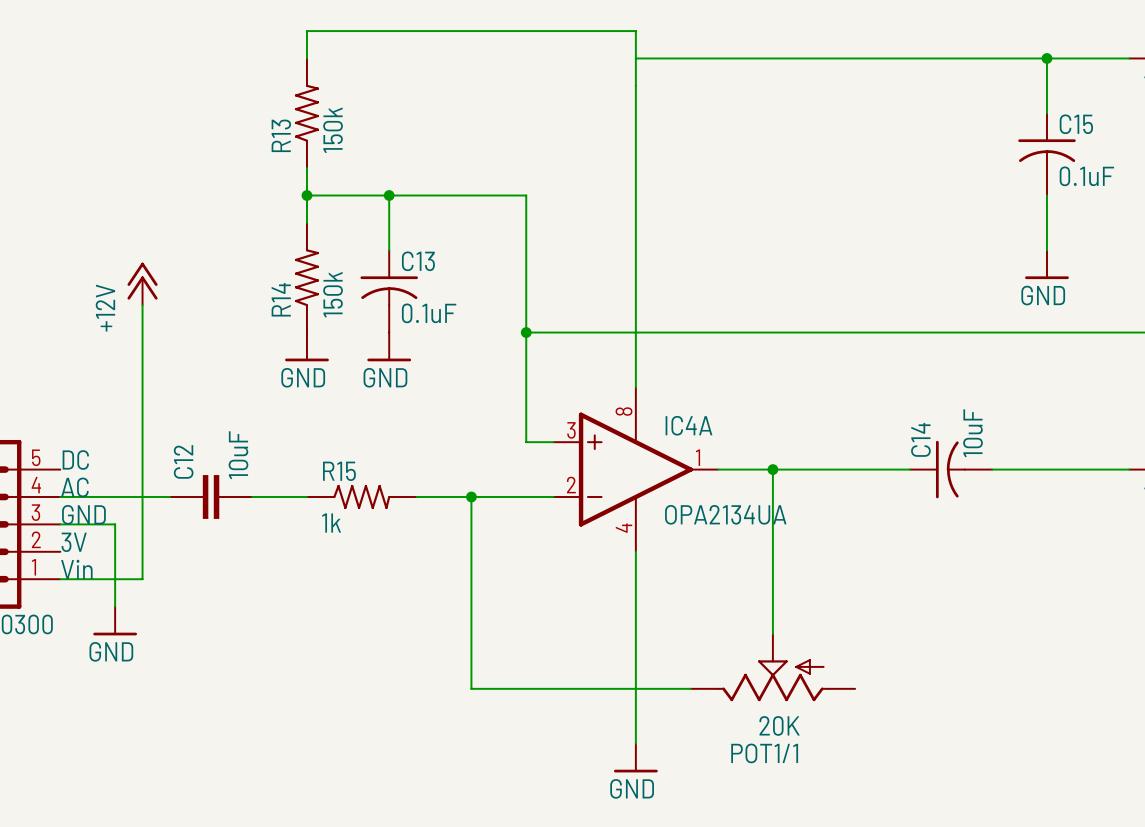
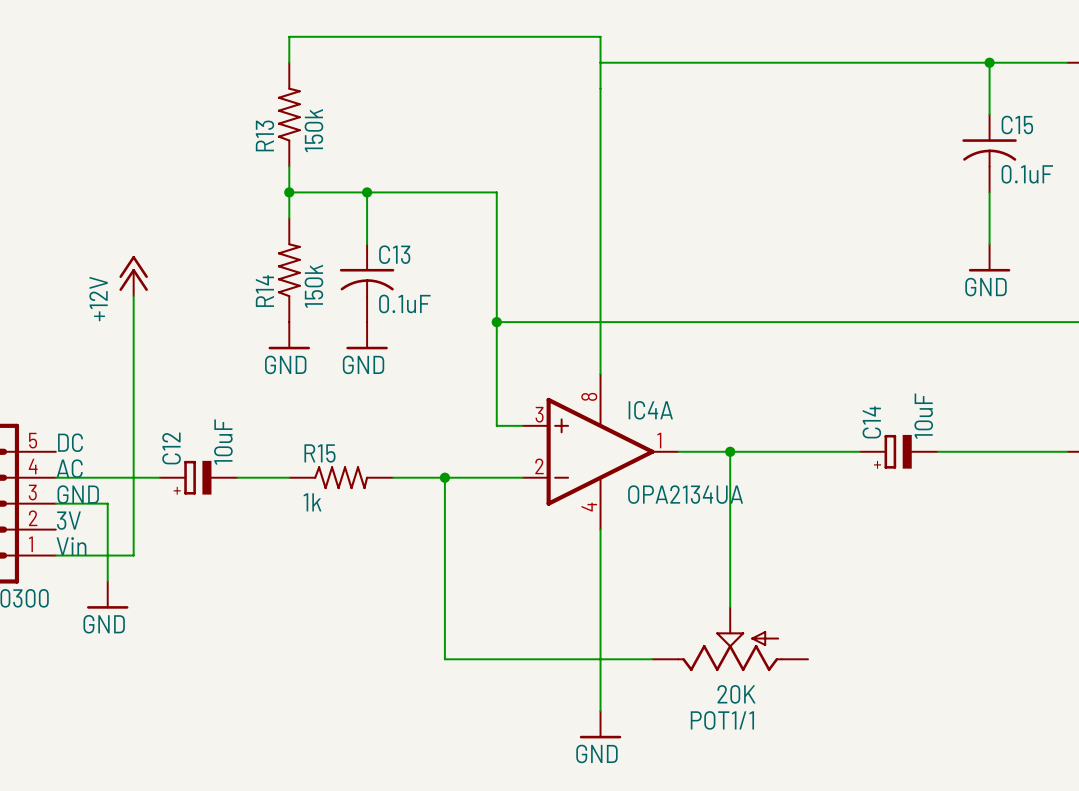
C14 symbol: [909, 440, 993, 499] -> [859, 434, 938, 469]
C12 symbol: [169, 475, 253, 519] -> [159, 460, 238, 495]

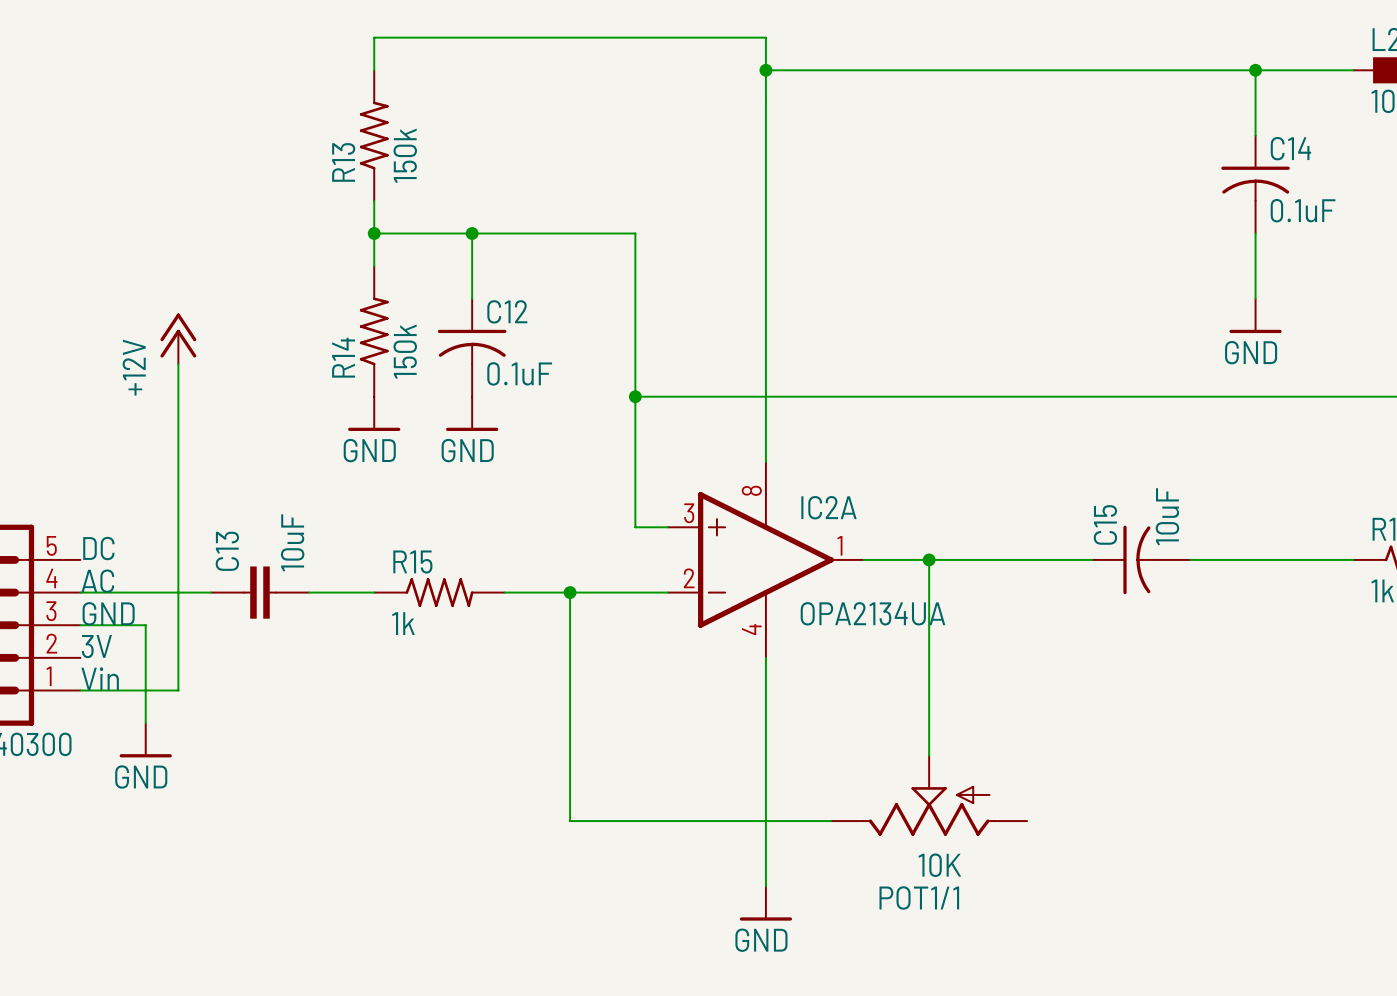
junction: none -> (765, 70)
C15 name: C15 (1017, 125) -> C14 (1290, 148)
C13 name: C13 (394, 254) -> C12 (507, 311)
IC4A name: IC4A (650, 410) -> IC2A (828, 507)
C14: 10uF (898, 451) -> none
C15: none -> 10uF (1141, 559)
C12: 10uF (198, 477) -> none
C13: none -> 10uF (259, 592)
POT1/1 value: 20K (736, 694) -> 10K (939, 865)

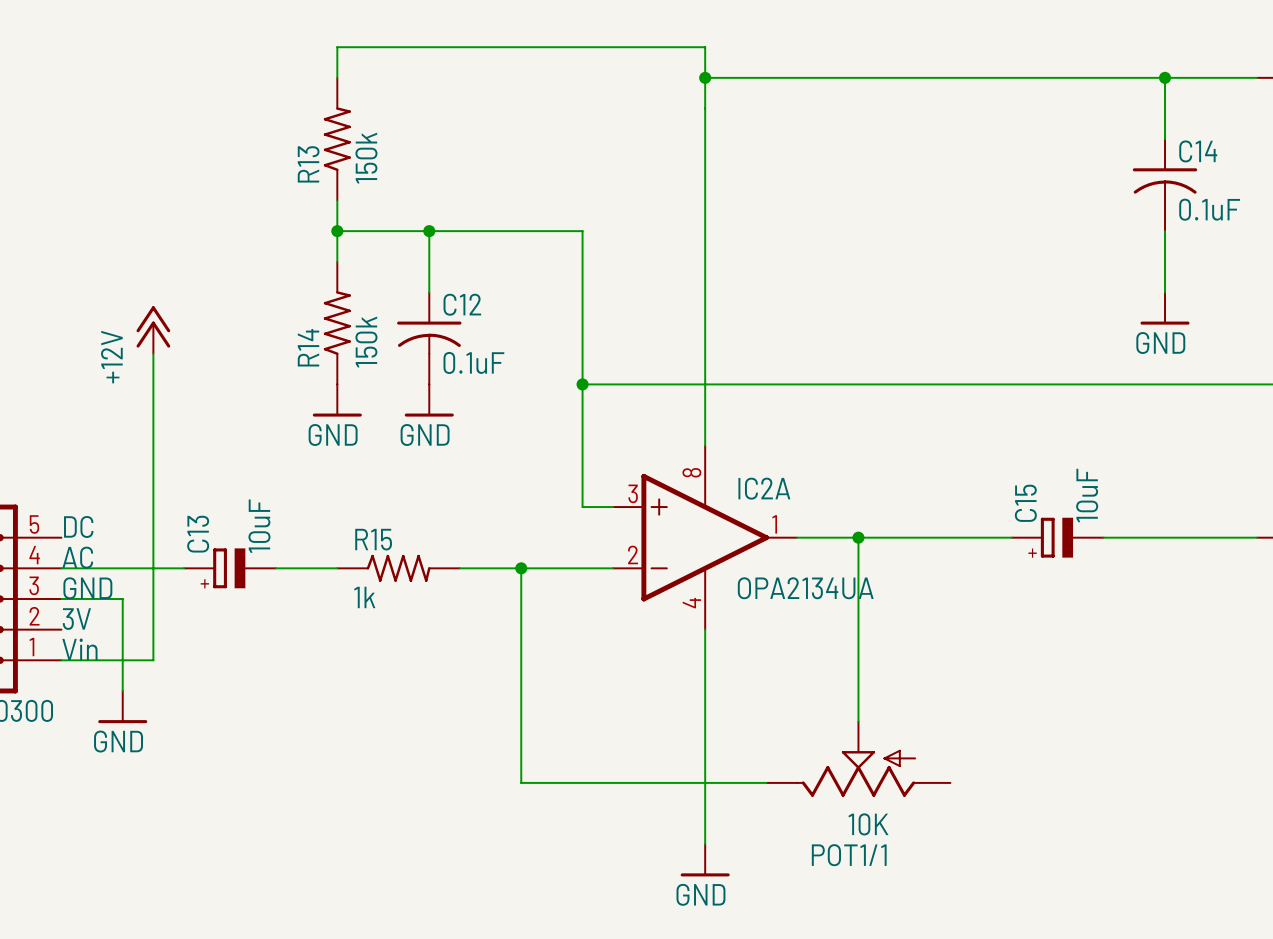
C15 symbol: [1092, 525, 1191, 595] -> [1011, 517, 1104, 558]
C13 symbol: [211, 566, 309, 619] -> [184, 548, 277, 589]

